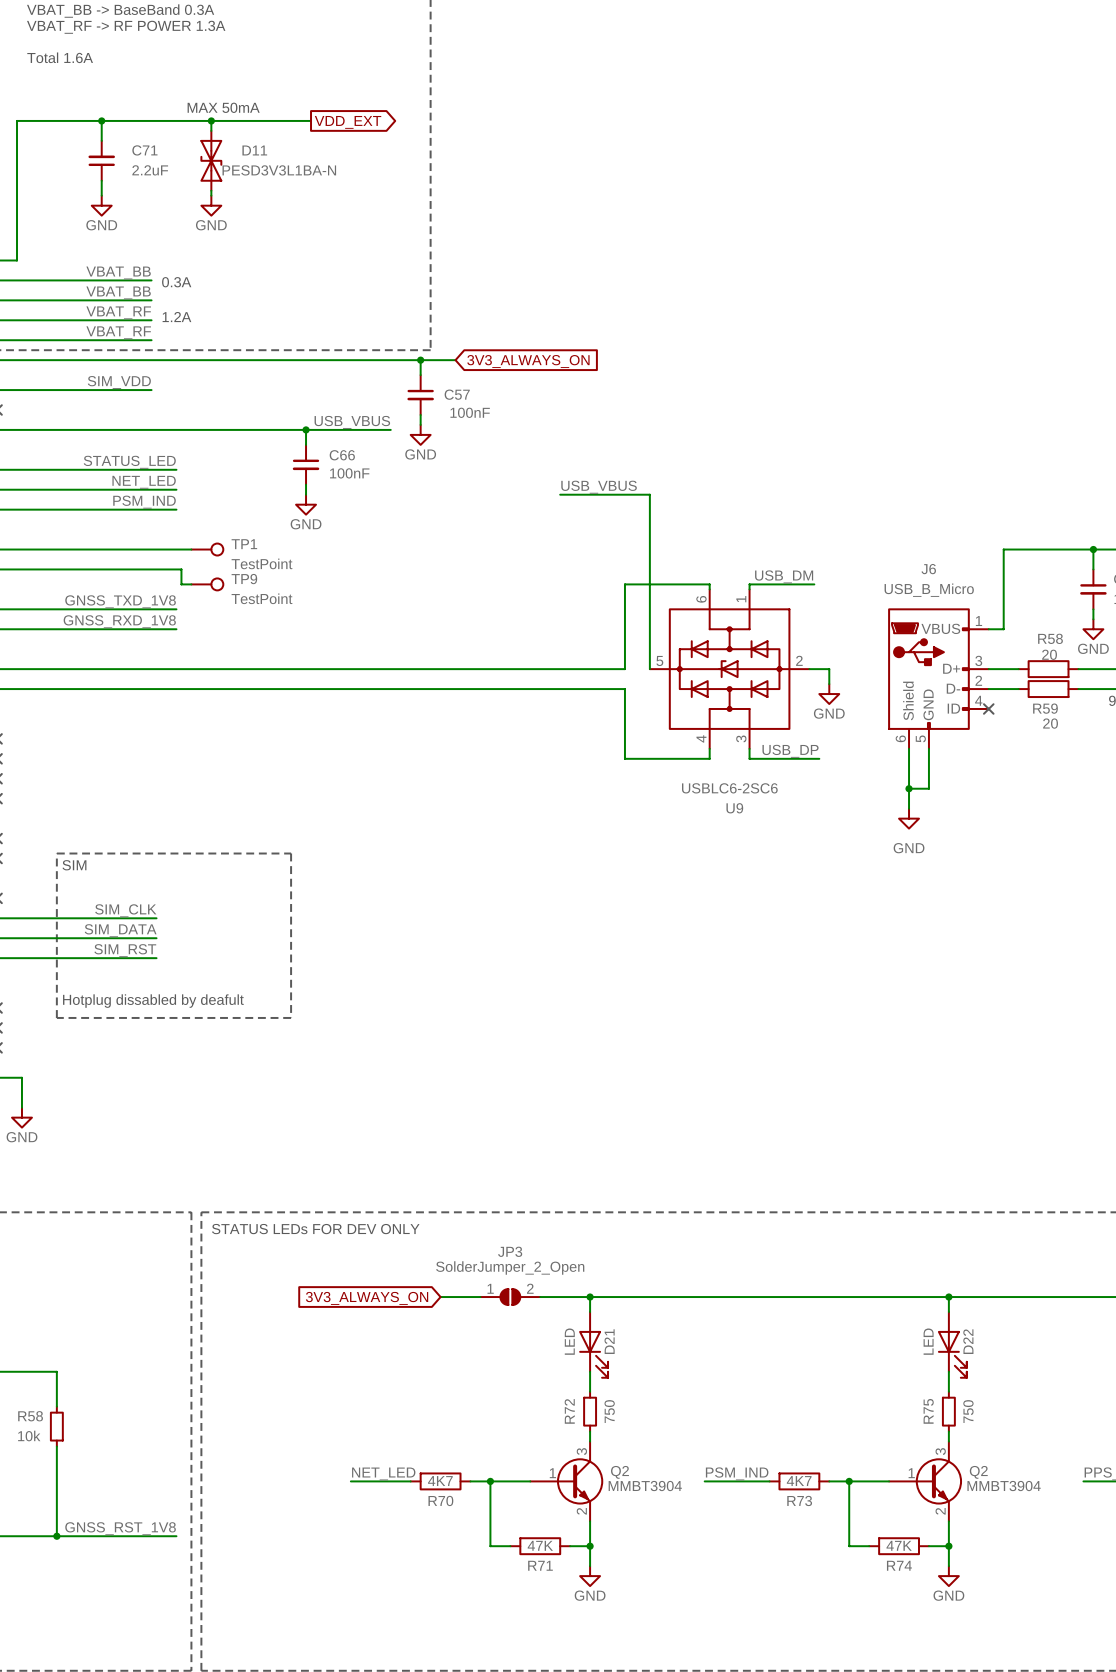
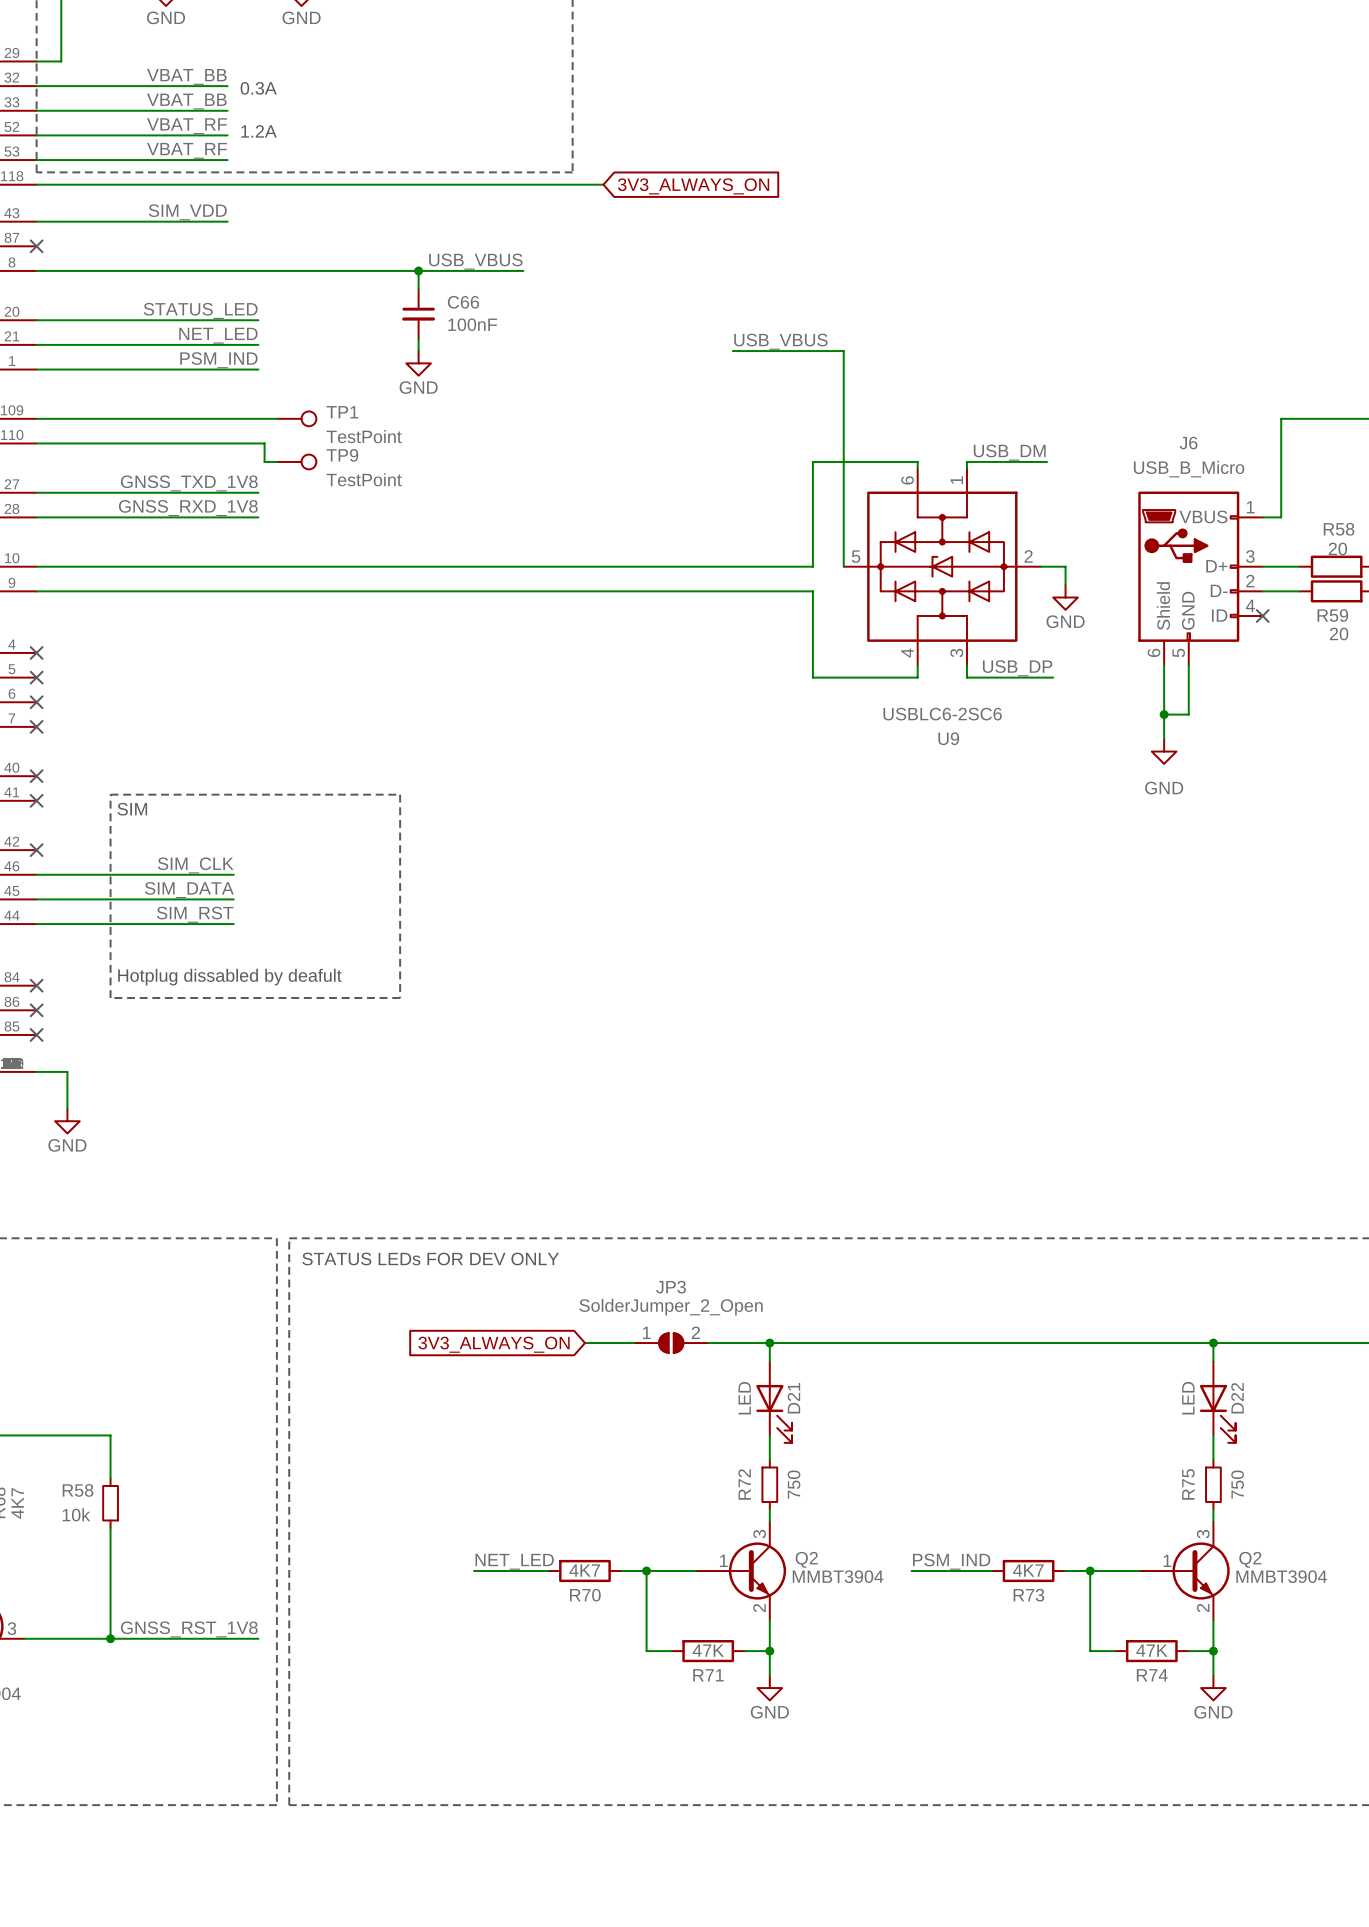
wire: (420, 360) (420, 375) -> none
junction: (420, 360) -> none
C57: 100nF (420, 395) -> none
wire: (420, 414) (420, 424) -> none
power symbol: GND (420, 434) -> none

